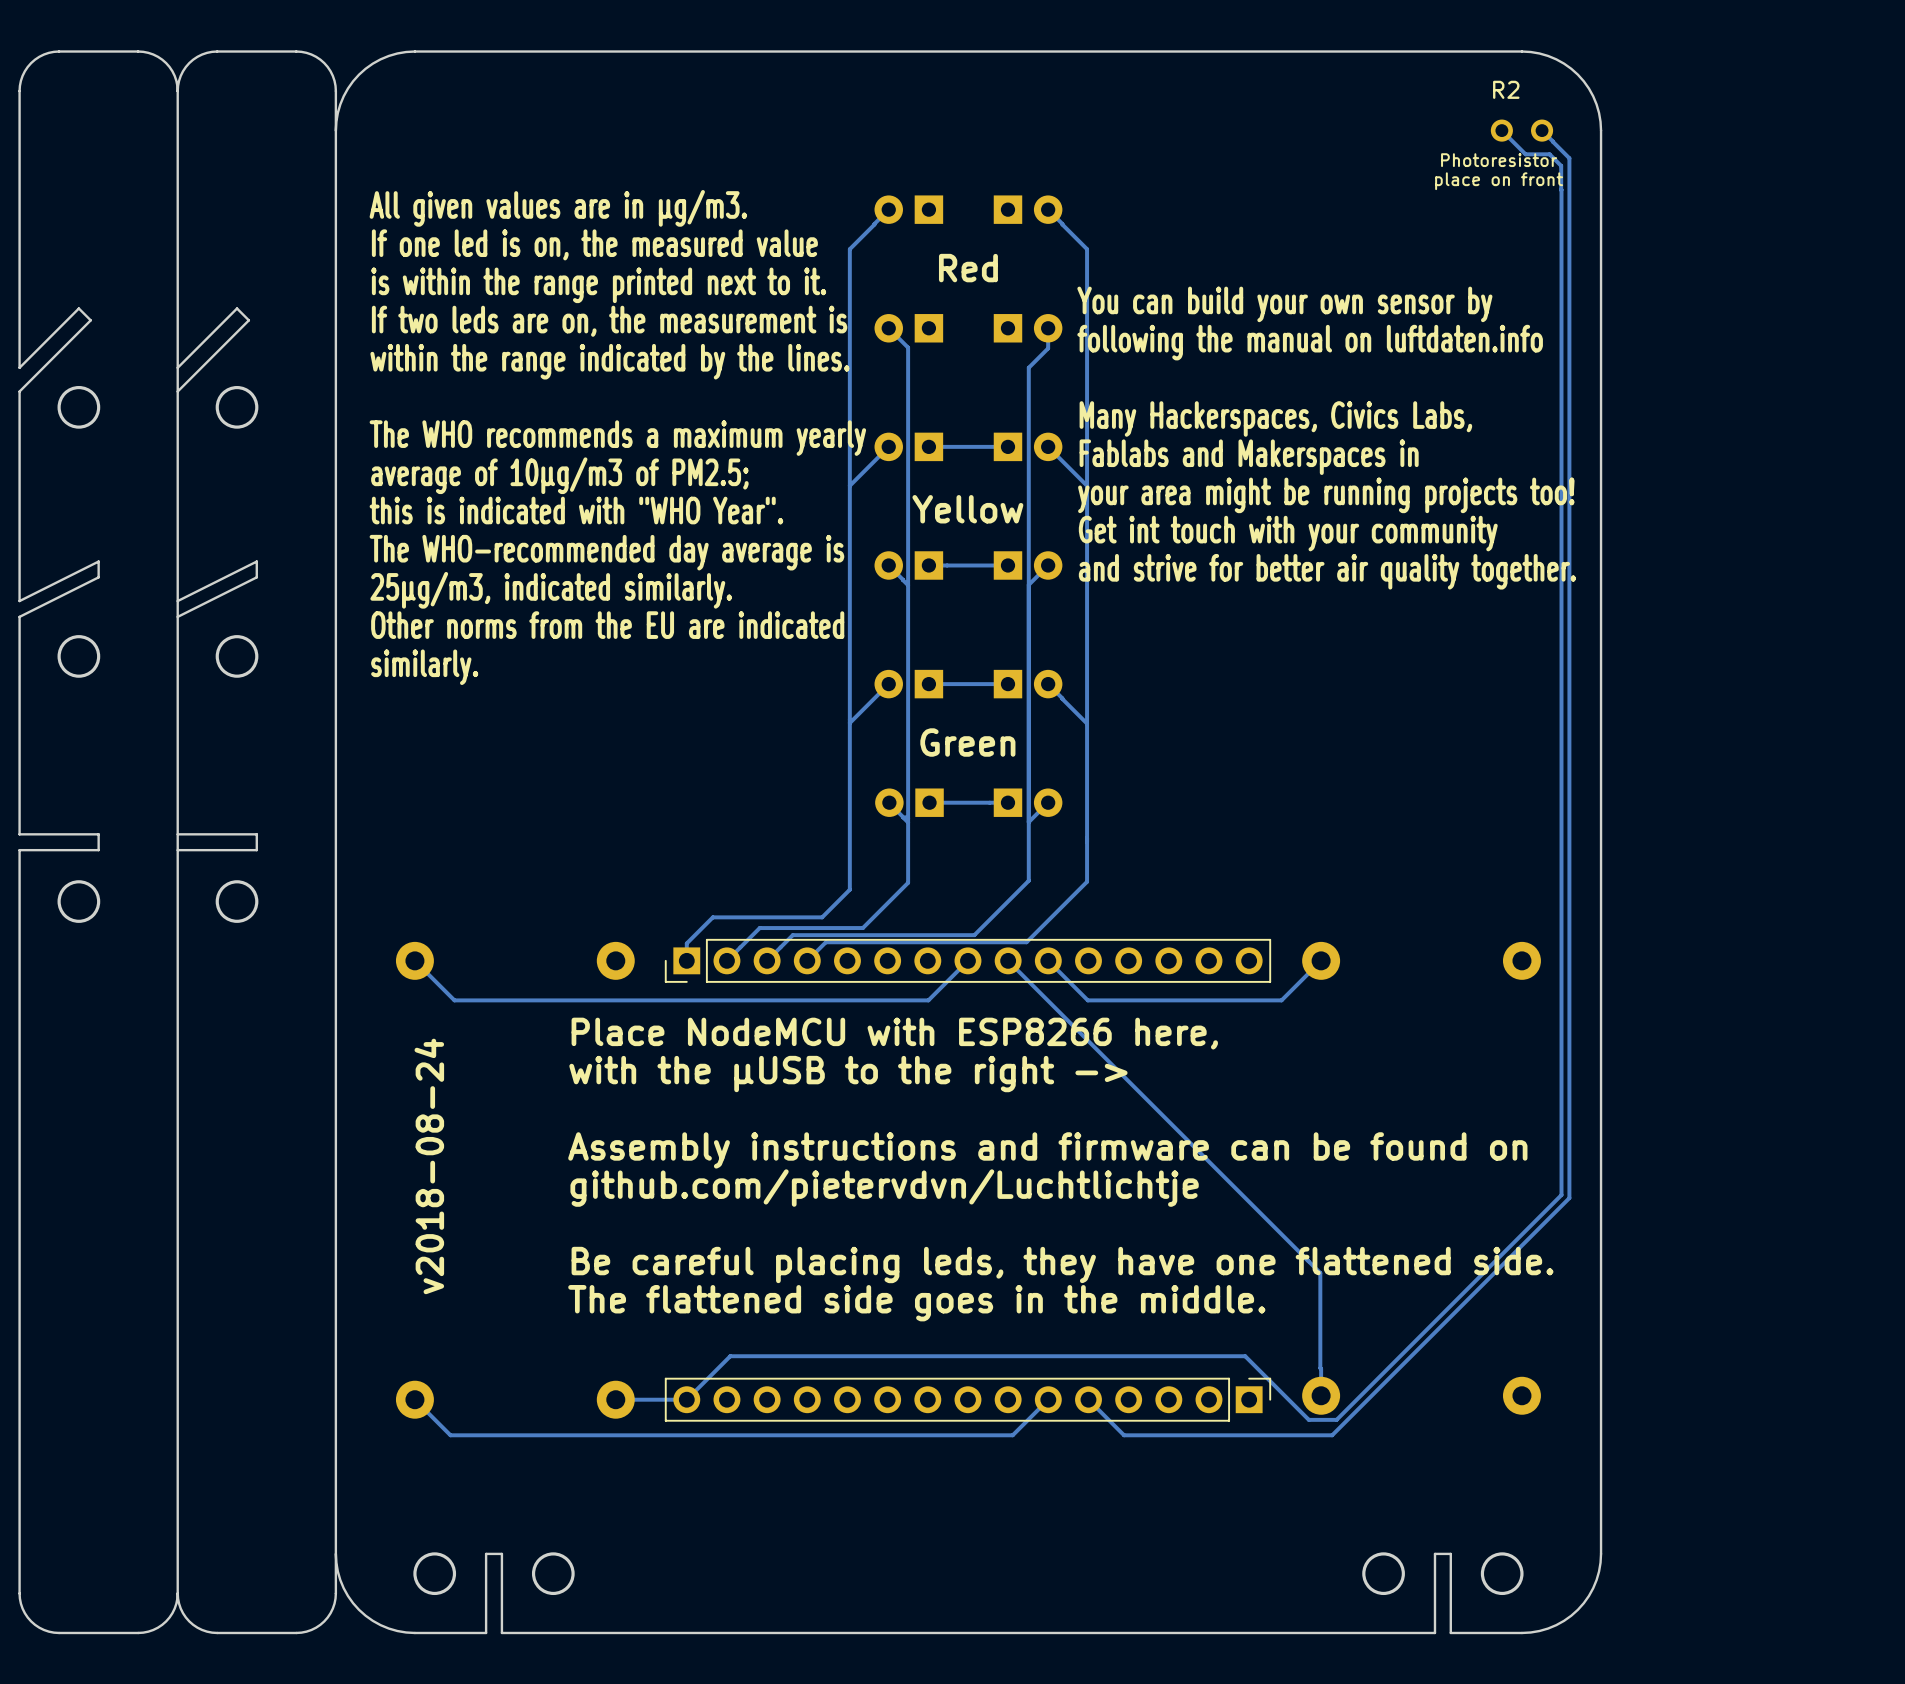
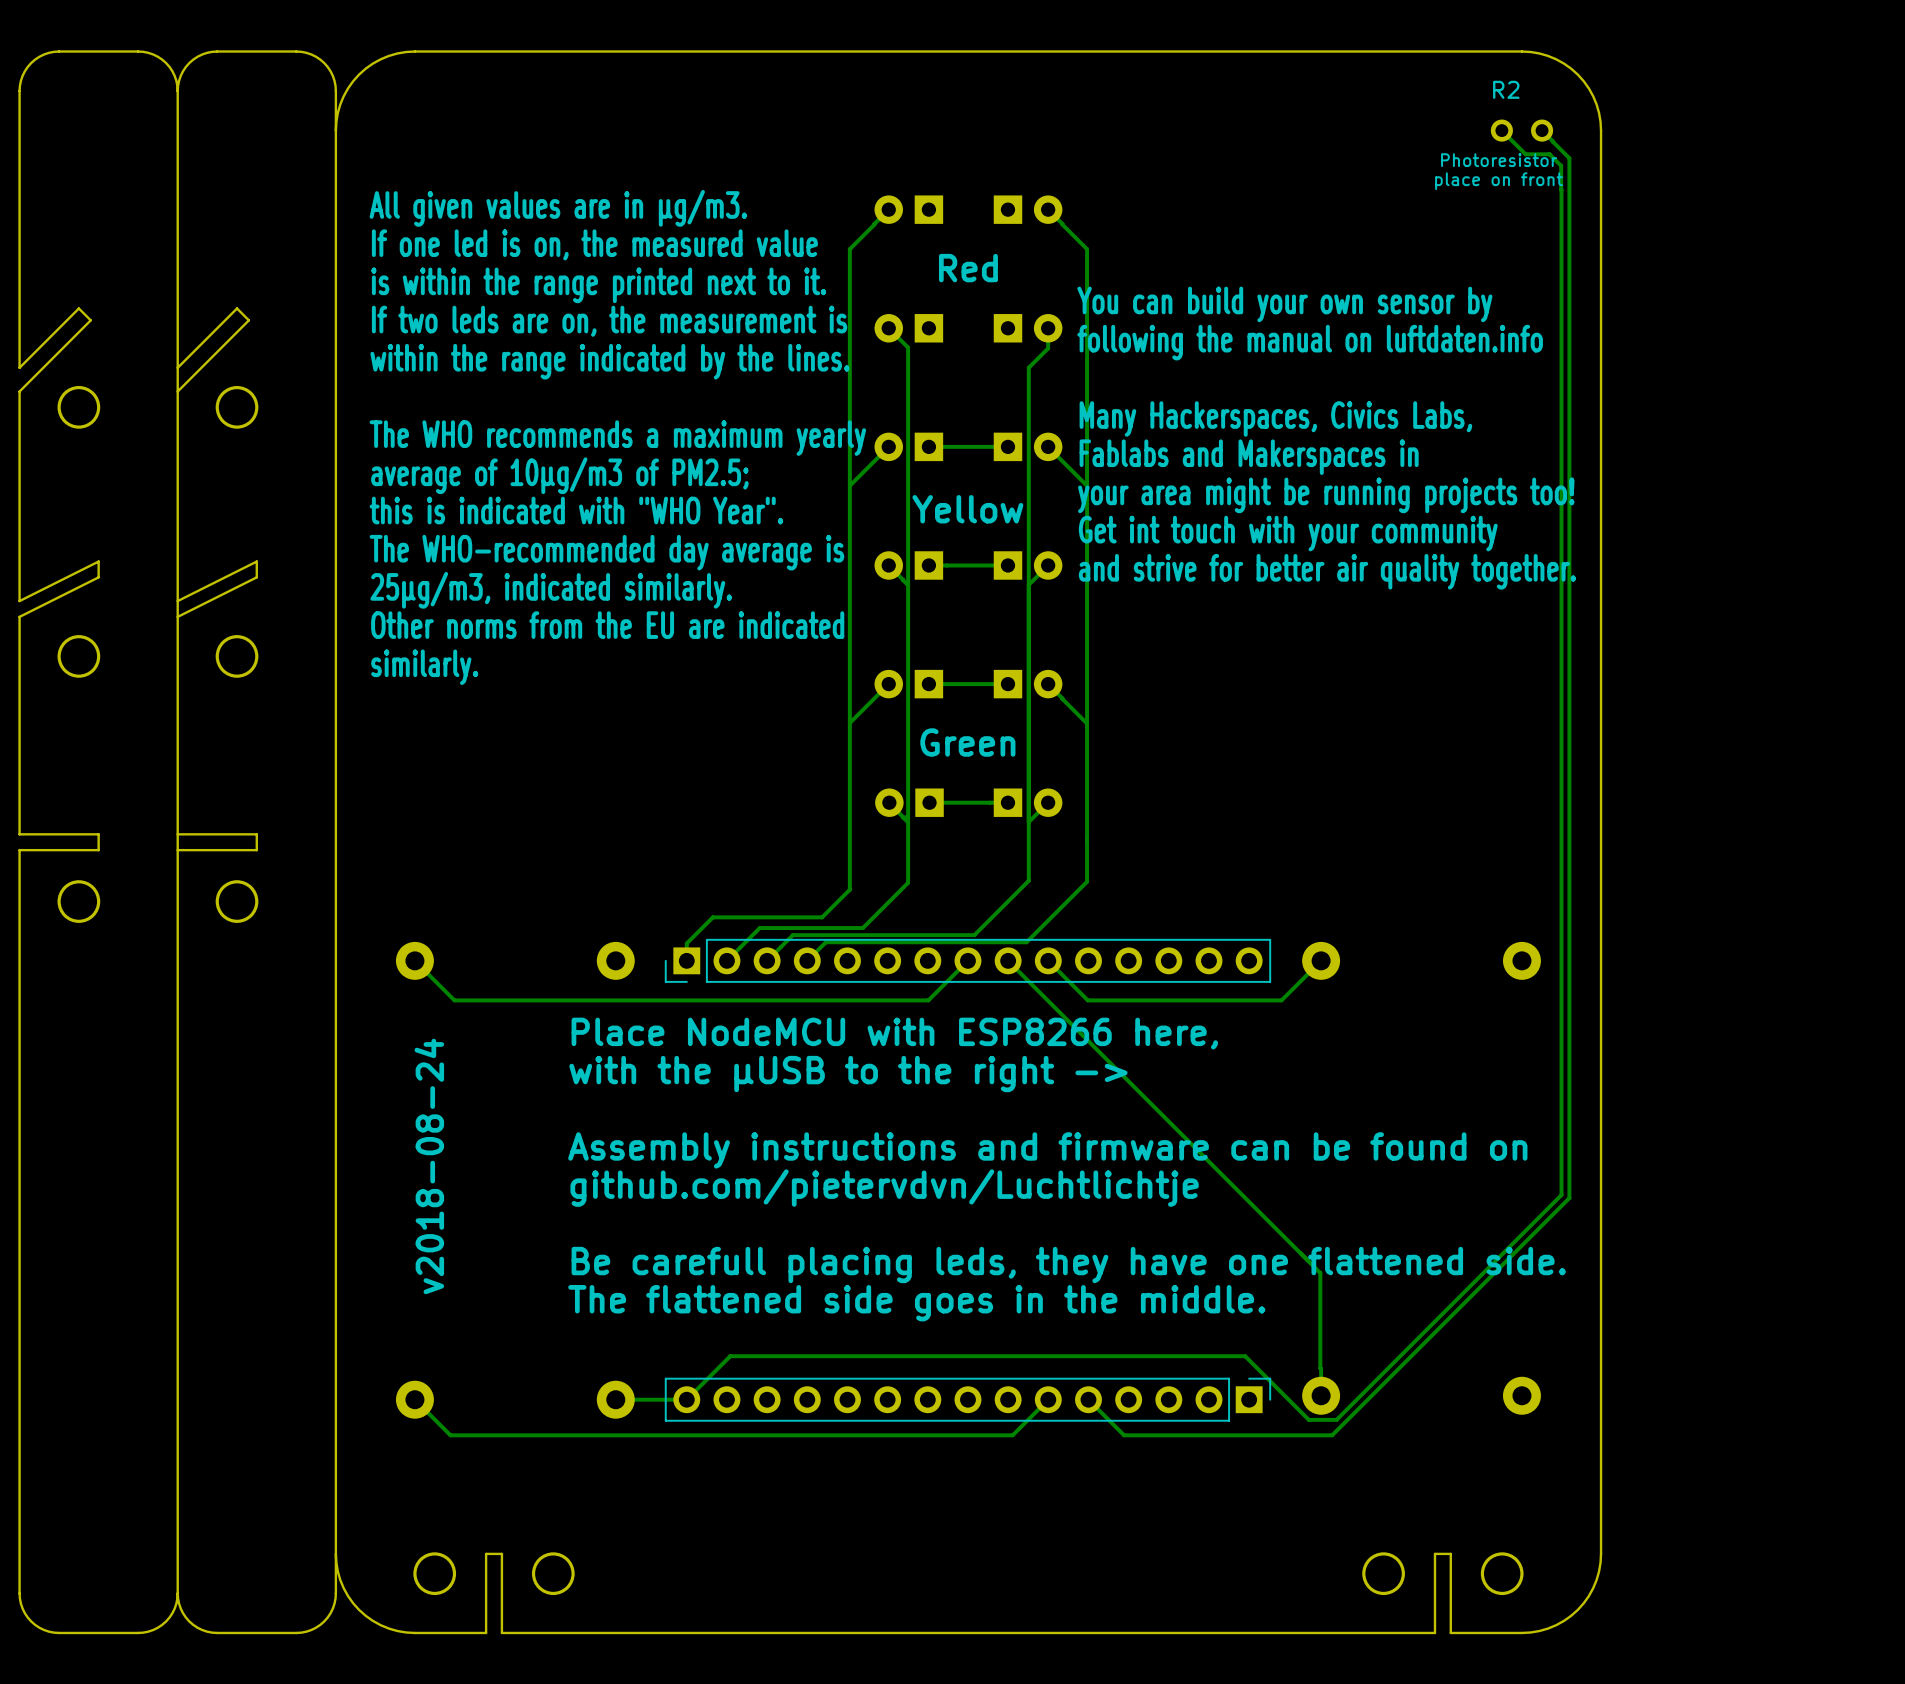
text: Be careful placing leds, they have one flattened side. (1062, 1264) -> Be carefull placing leds, they have one flattened side. (1068, 1264)

